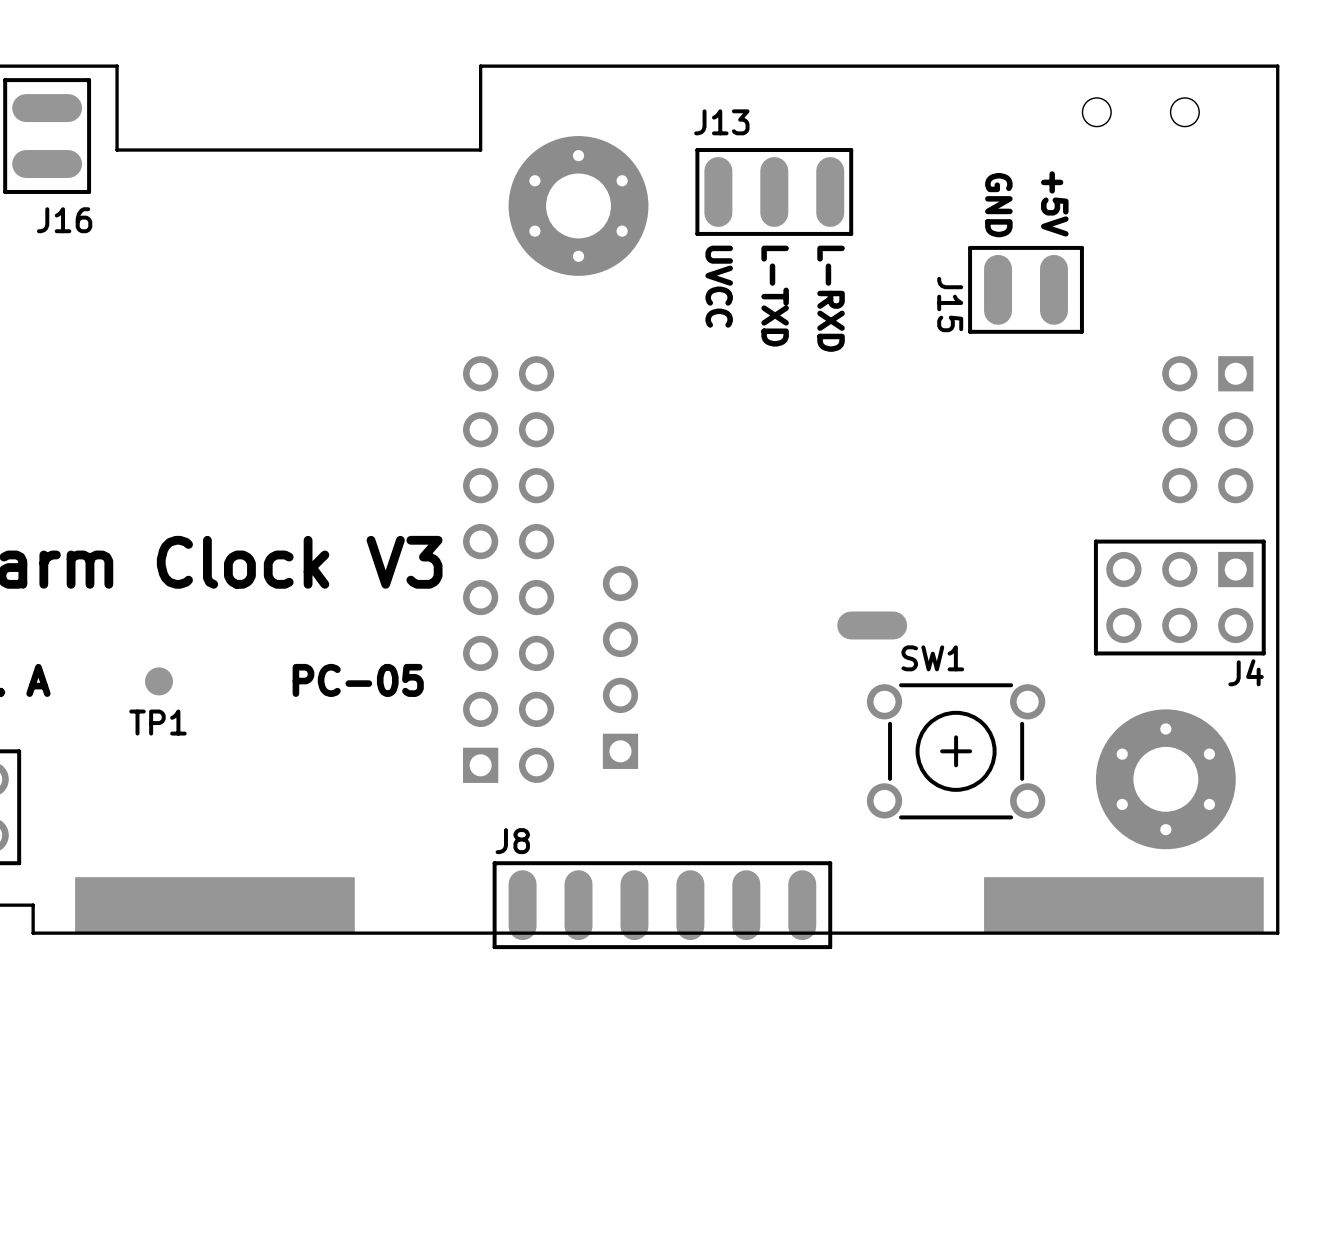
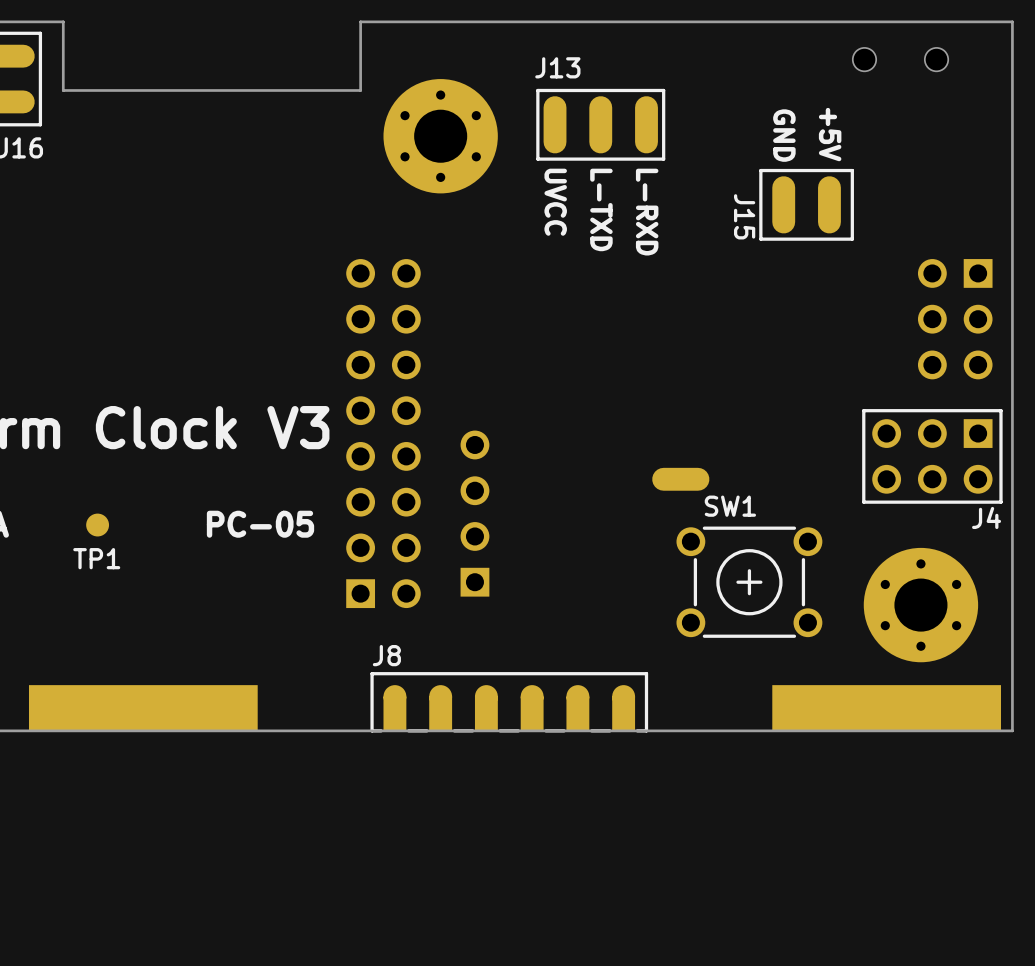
J8 footprint: [492, 861, 833, 950] -> [370, 672, 649, 733]

